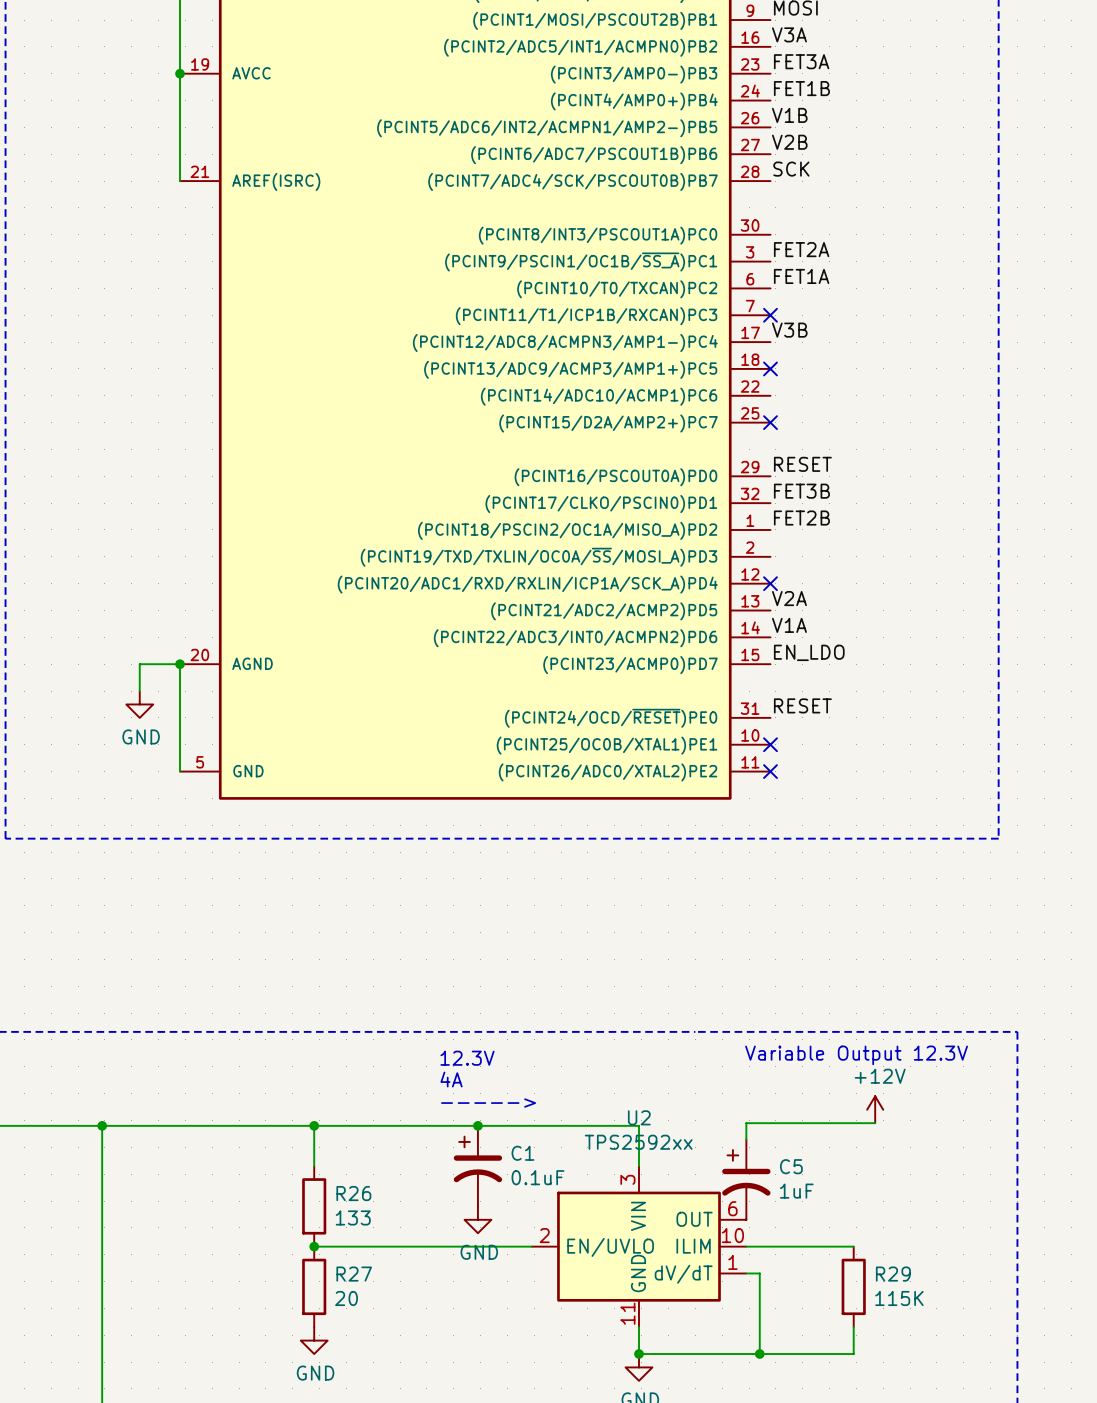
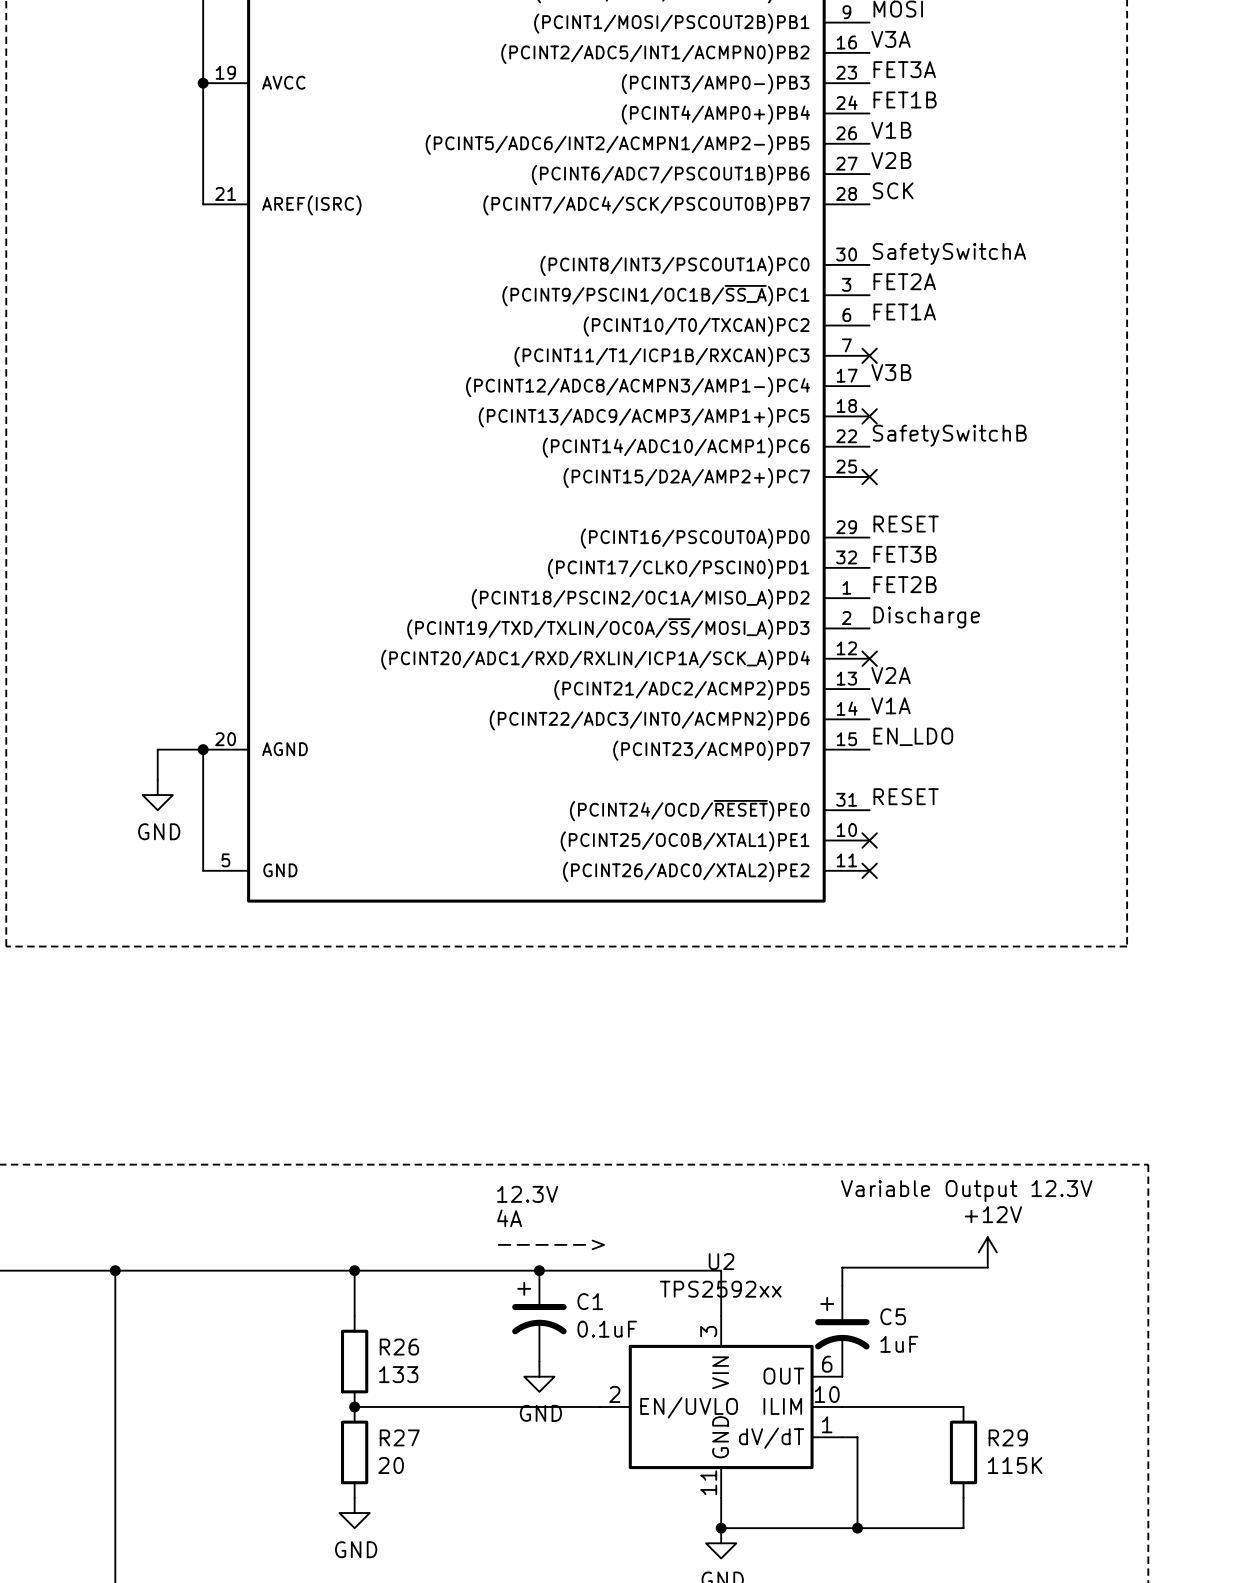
label: none -> SafetySwitchA (949, 253)
label: none -> SafetySwitchB (949, 435)
label: none -> Discharge (926, 617)

